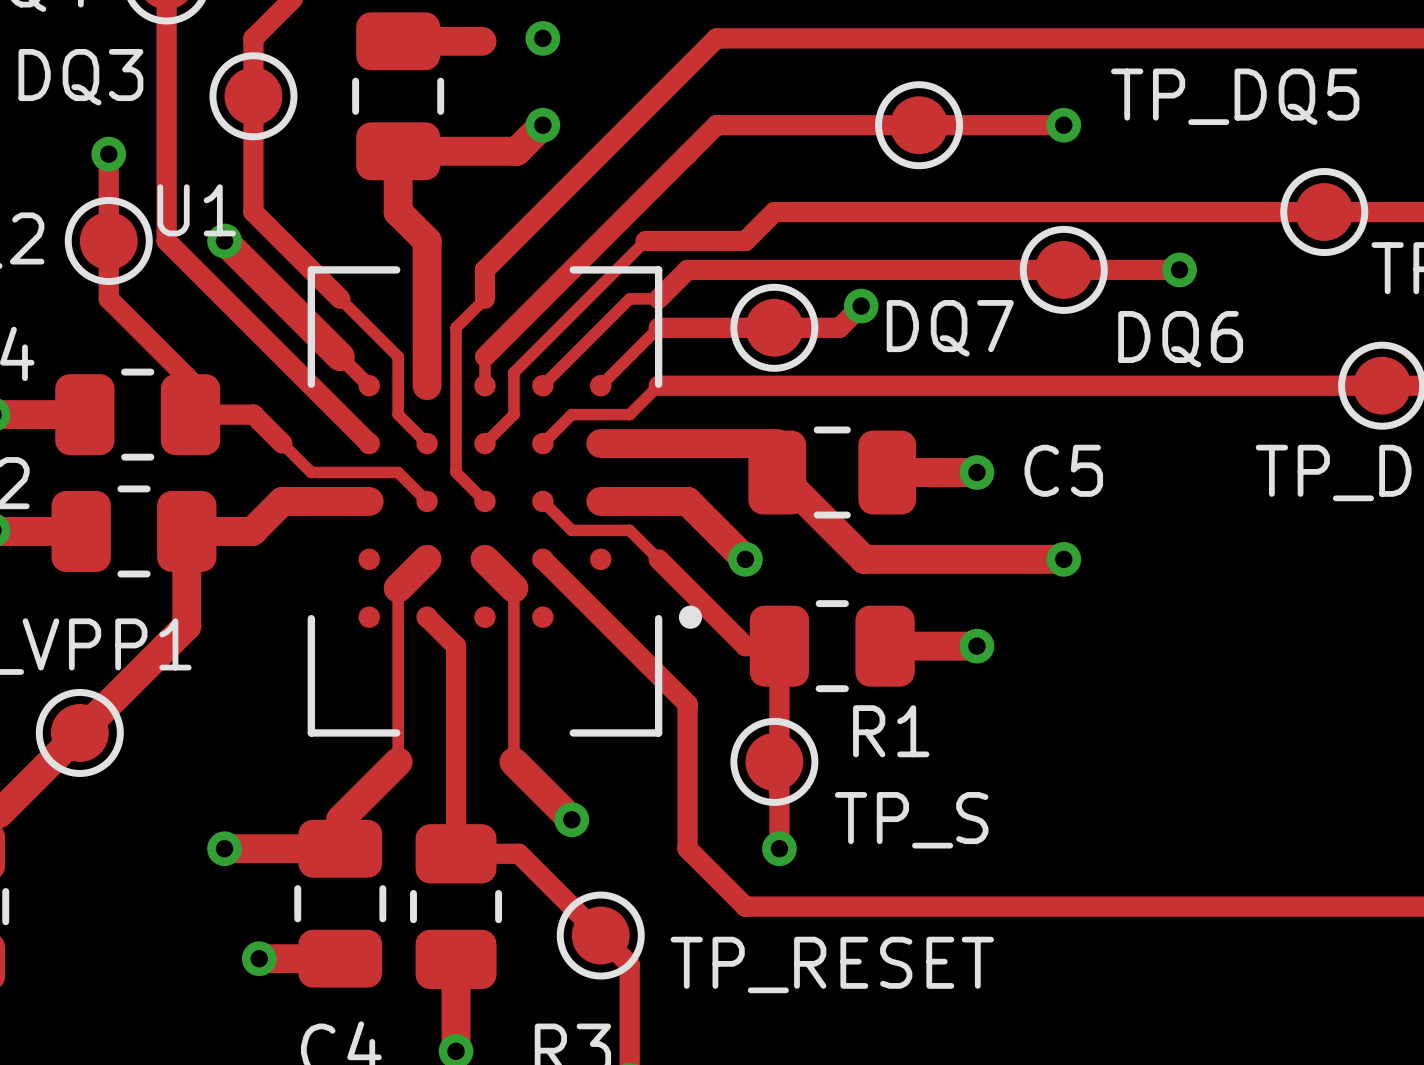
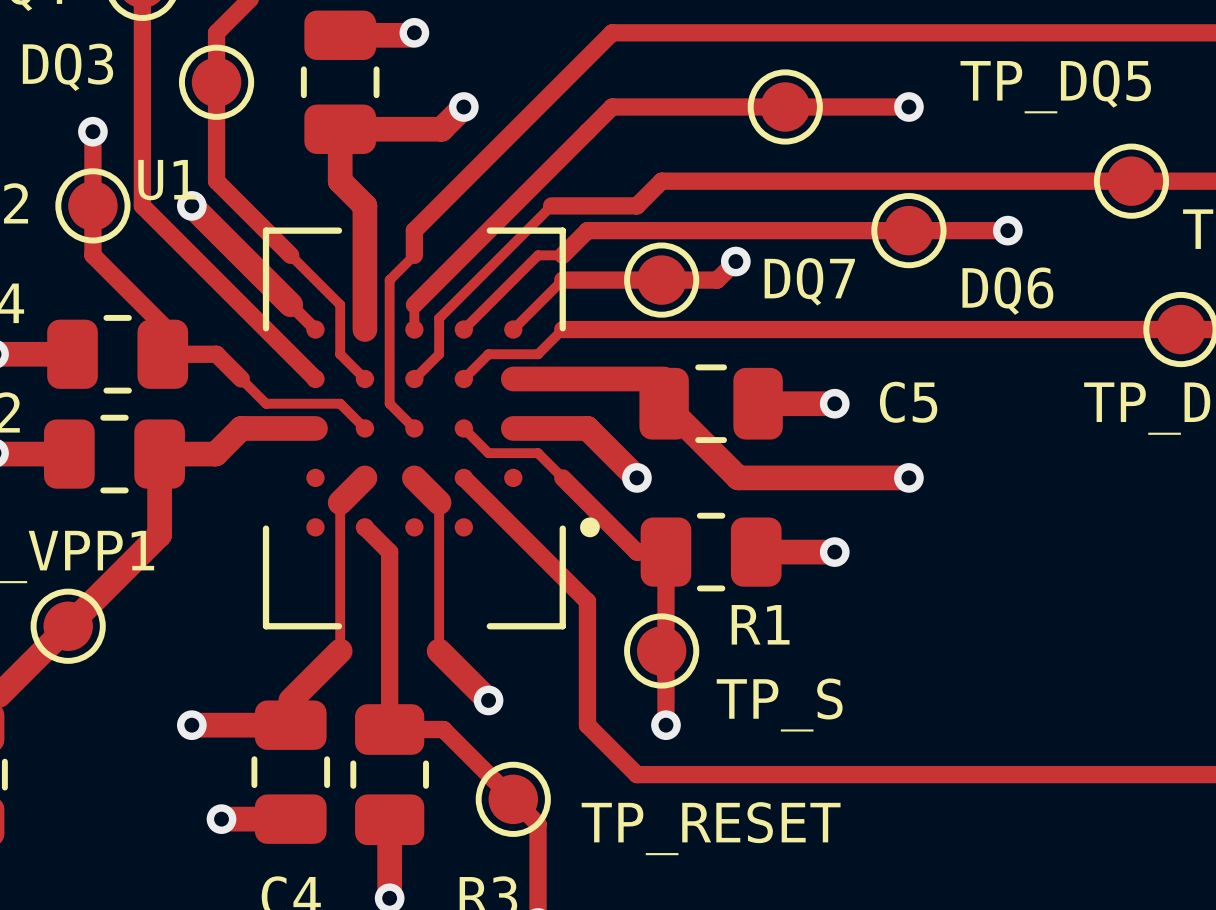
via position: (542, 38) -> (414, 32)

